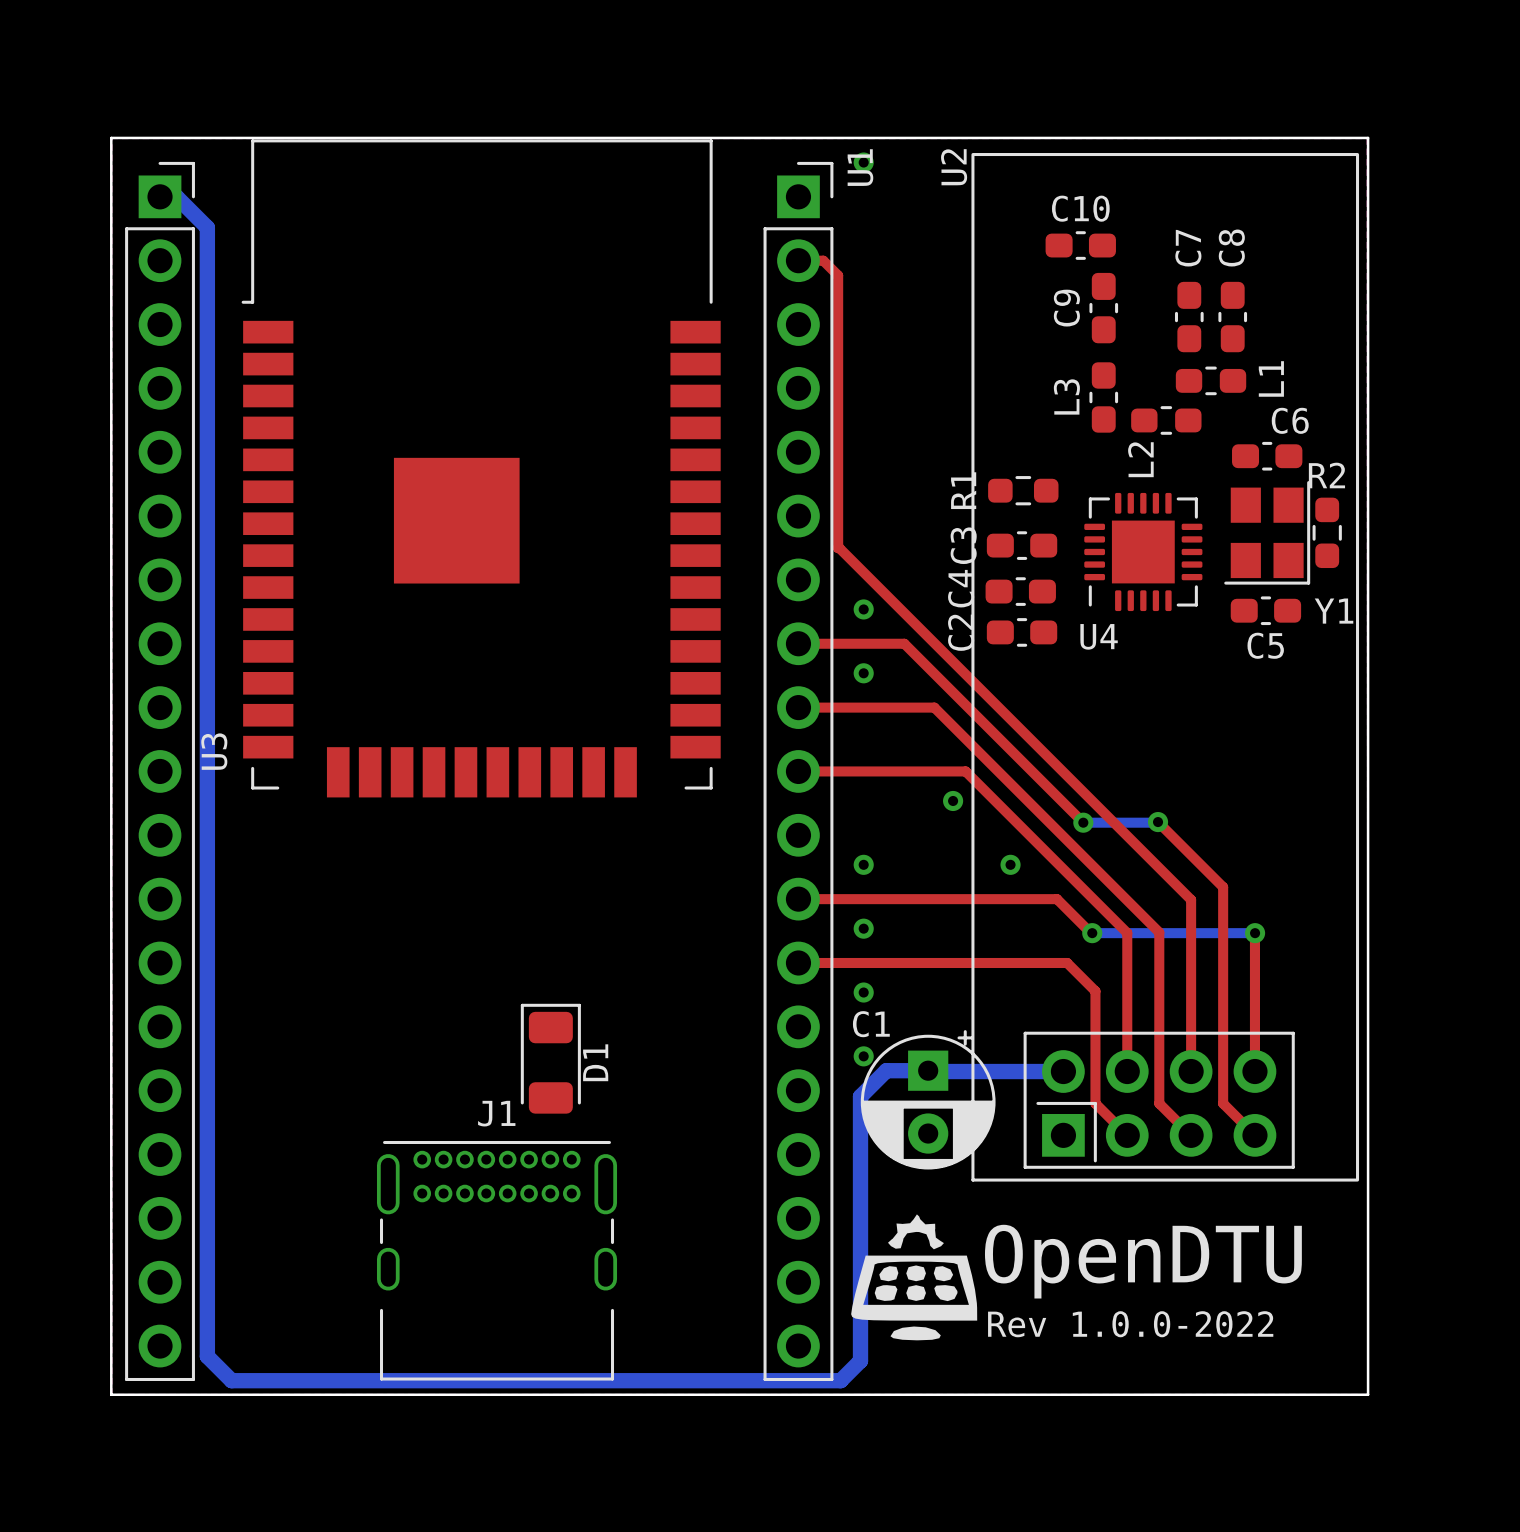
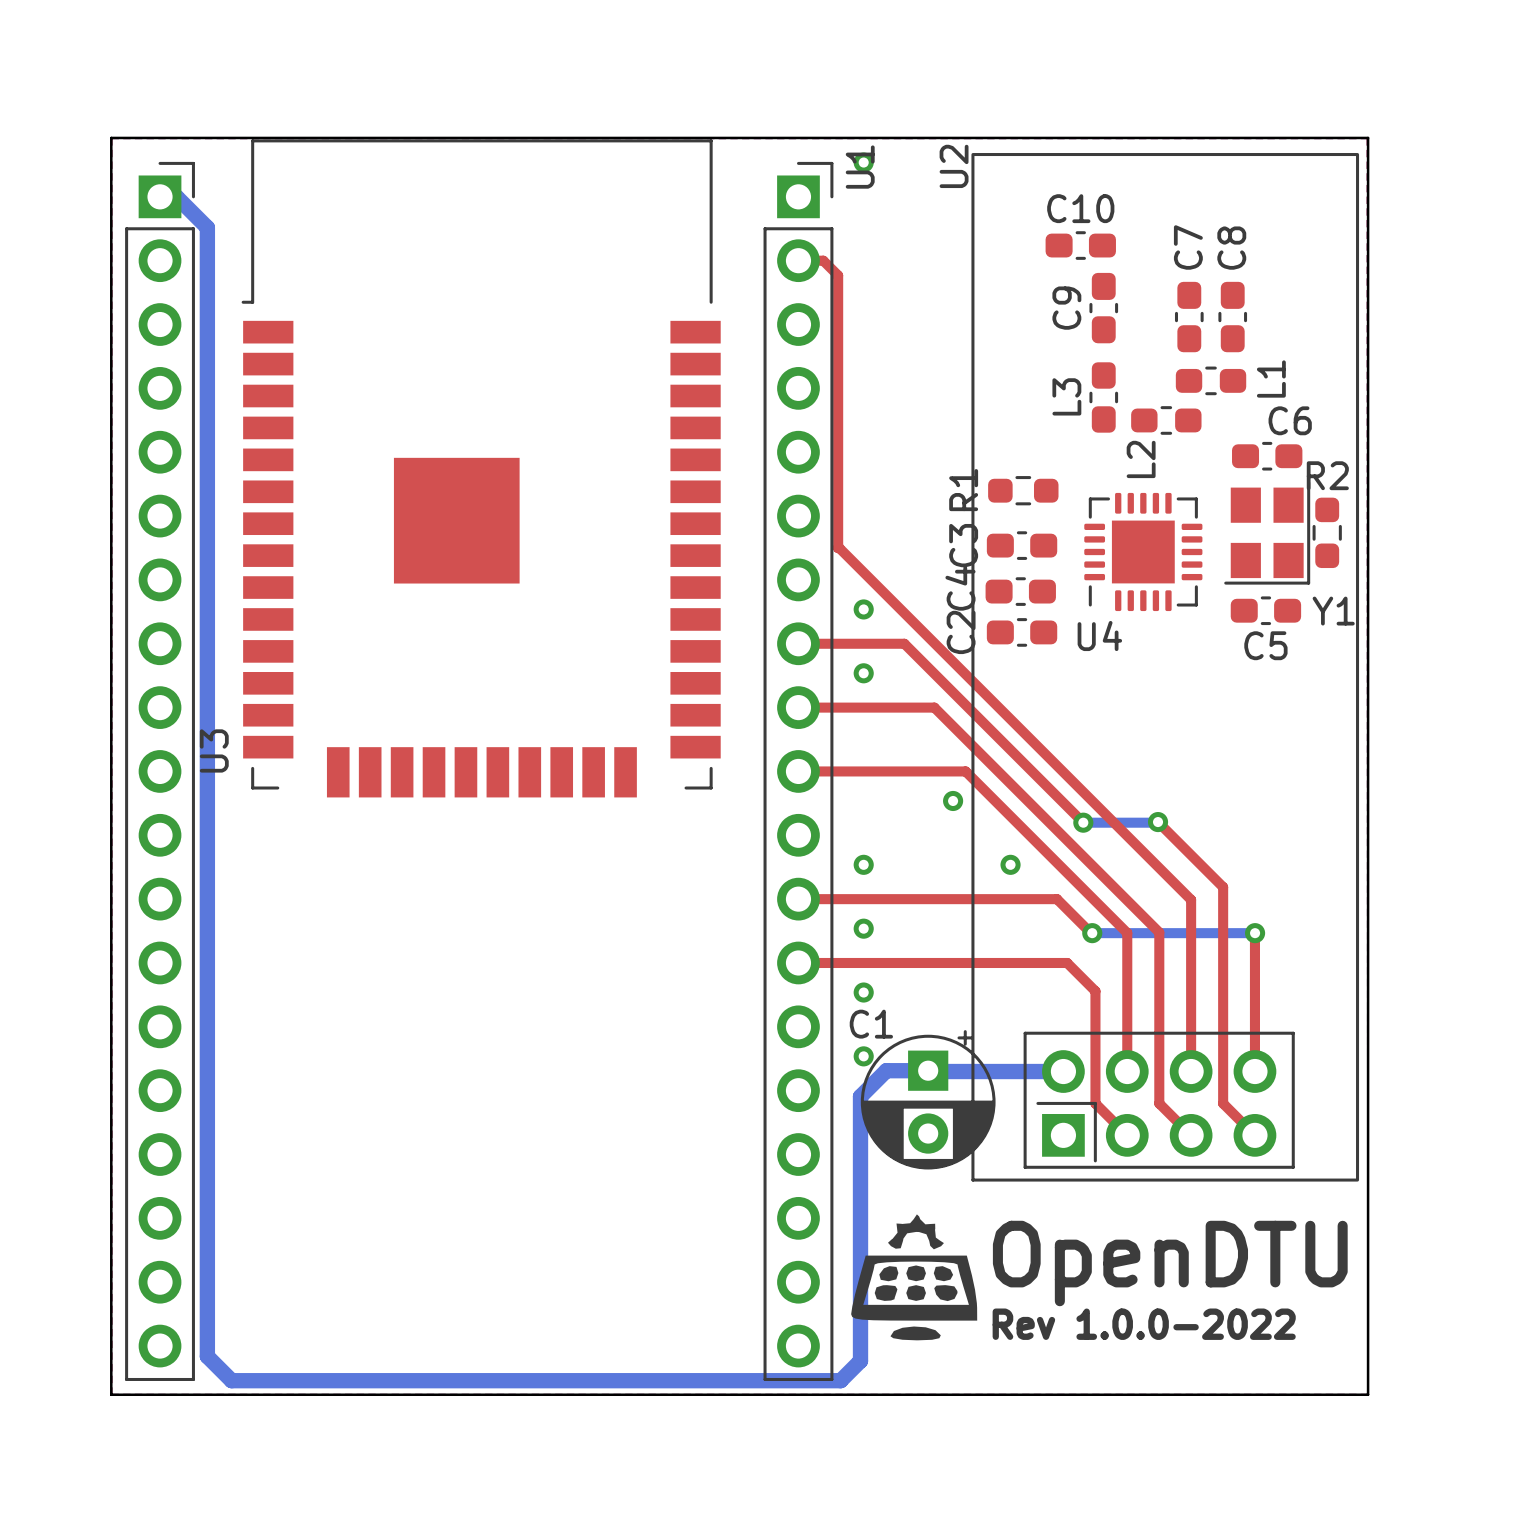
D1: (550, 1058) -> none
J1: (497, 1260) -> none

